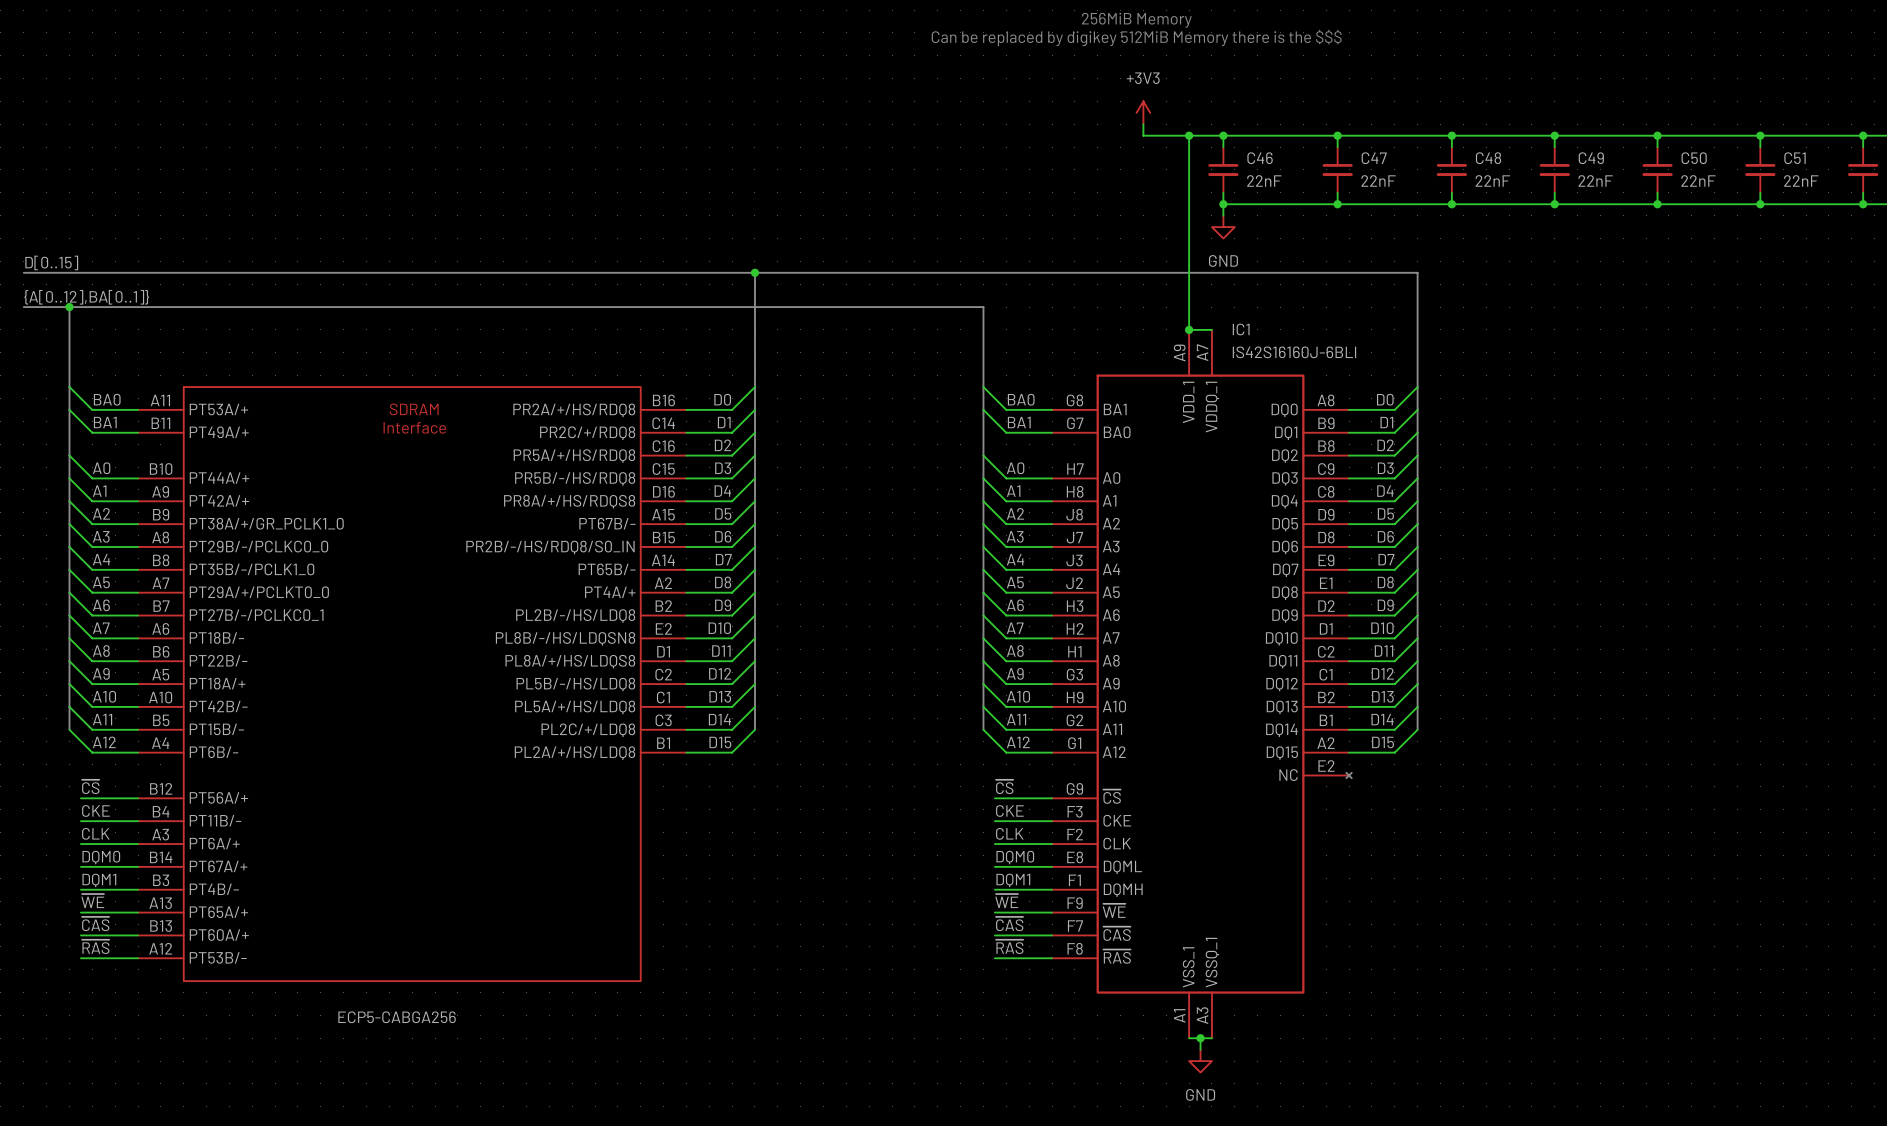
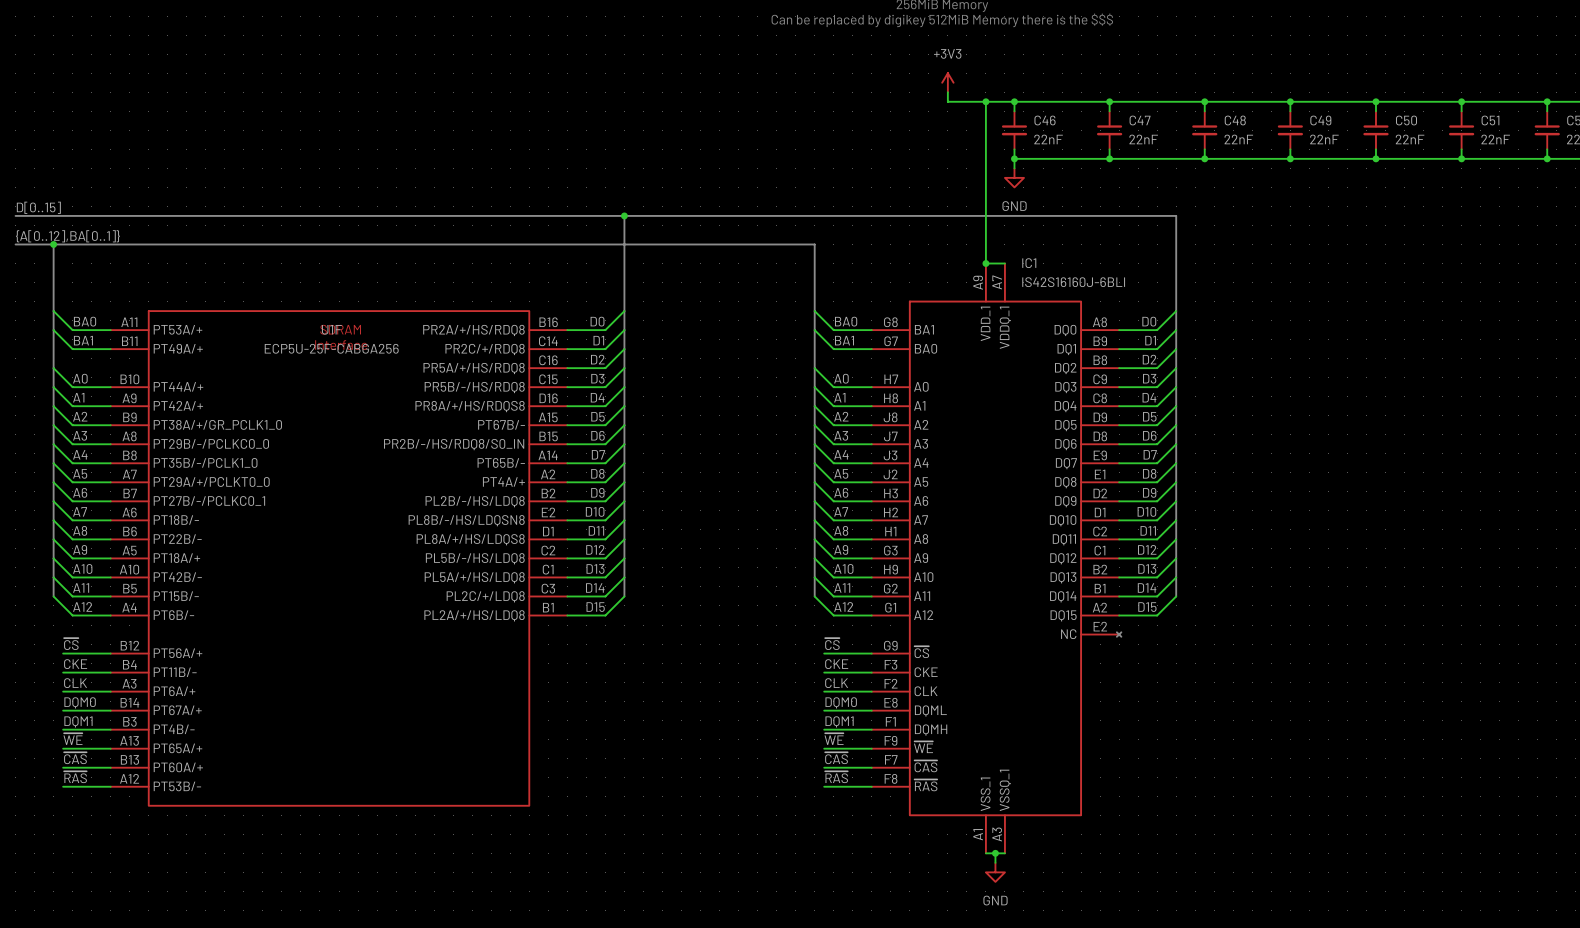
U1F name: none -> U1F (331, 329)
U1F value: ECP5-CABGA256 (397, 1017) -> ECP5U-25F-CABGA256 (331, 348)

